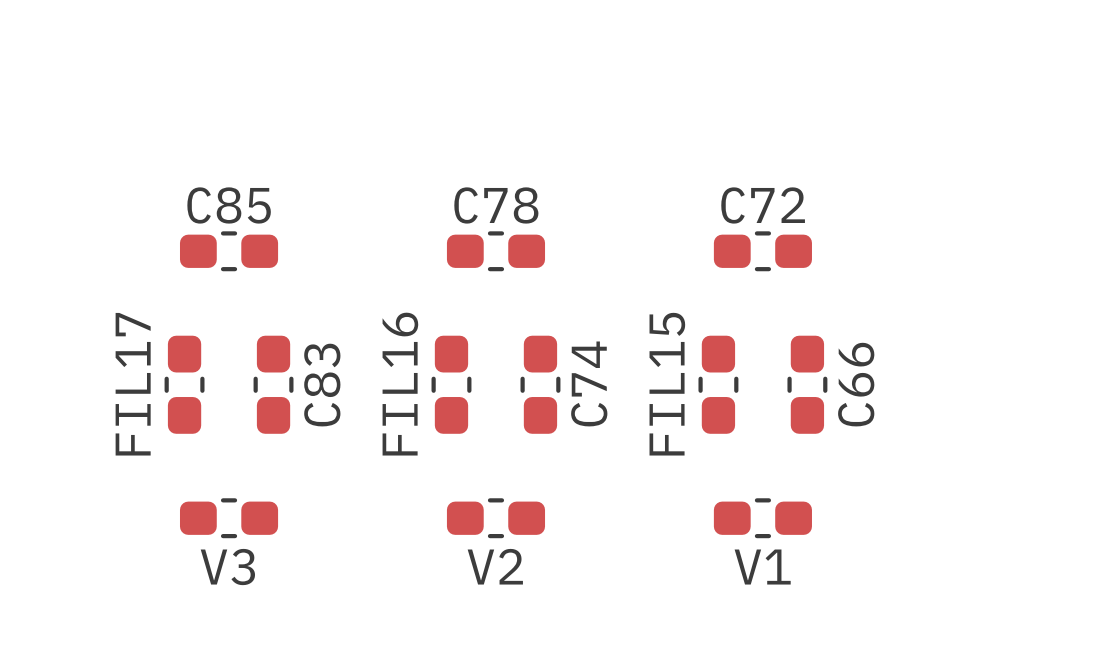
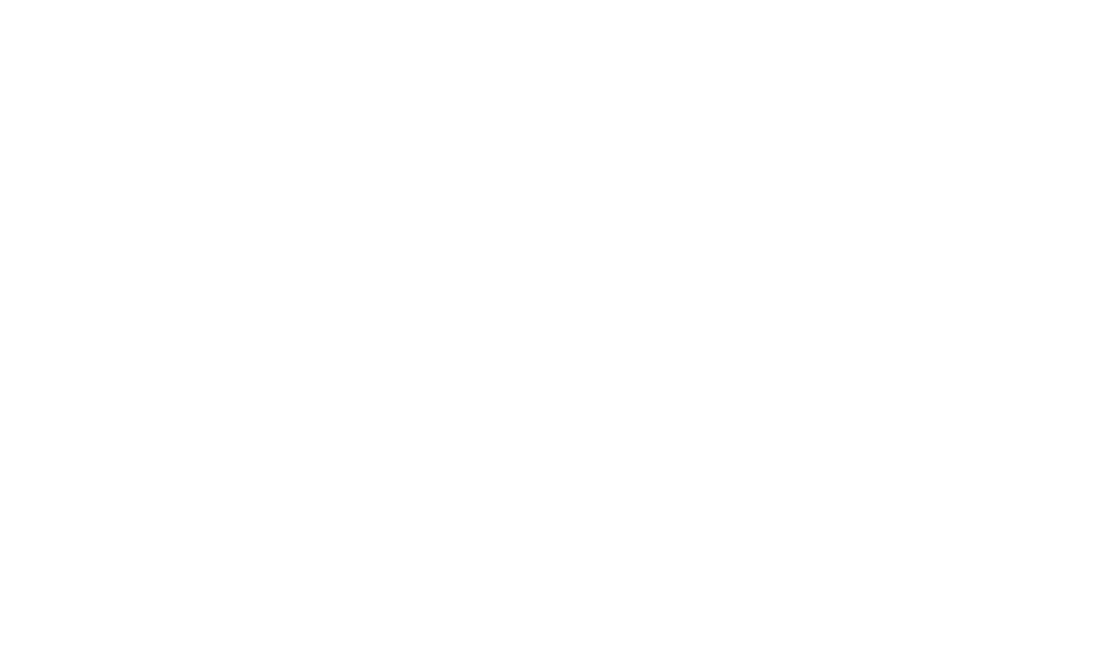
C85: (229, 251) -> none
C78: (495, 251) -> none
C72: (762, 251) -> none
FIL17: (184, 384) -> none
C83: (273, 384) -> none
FIL16: (451, 384) -> none
C74: (540, 384) -> none
FIL15: (718, 384) -> none
C66: (807, 384) -> none
V3: (229, 518) -> none
V2: (495, 518) -> none
V1: (762, 518) -> none

